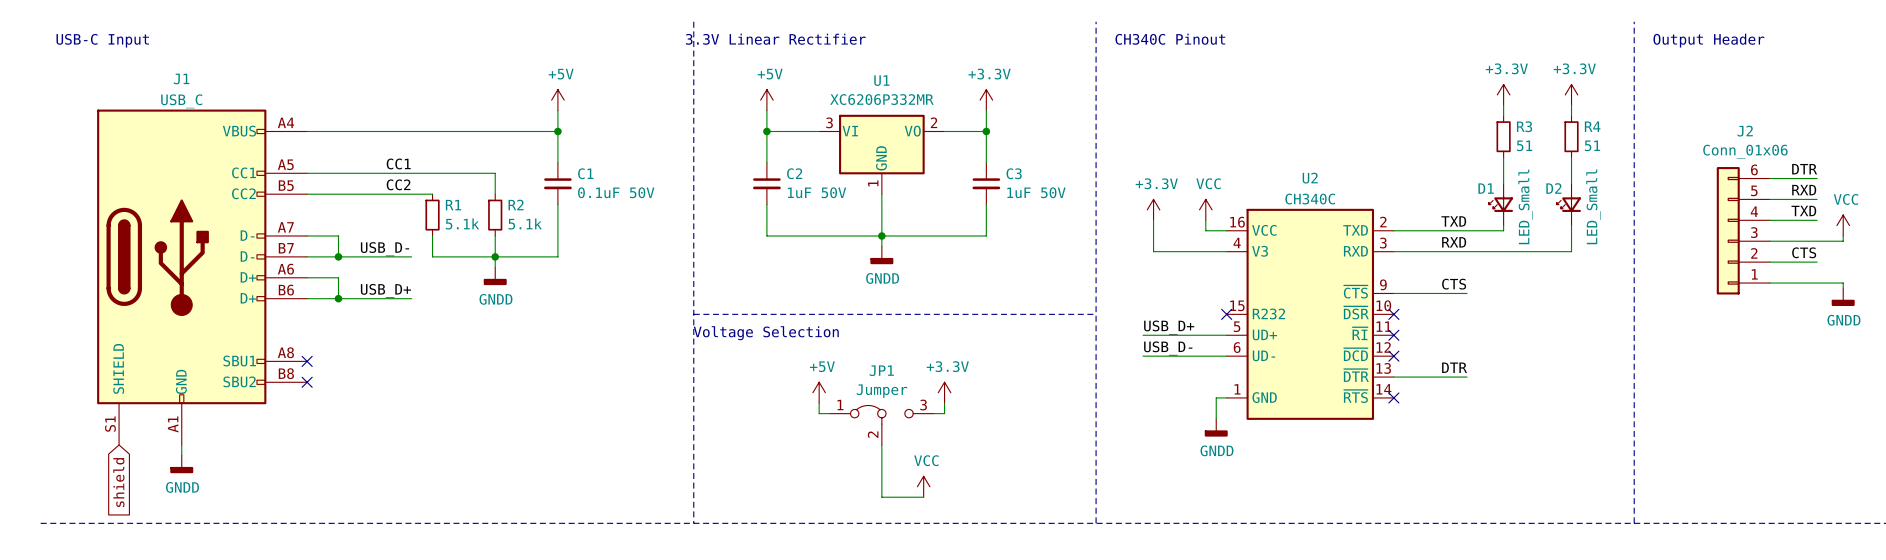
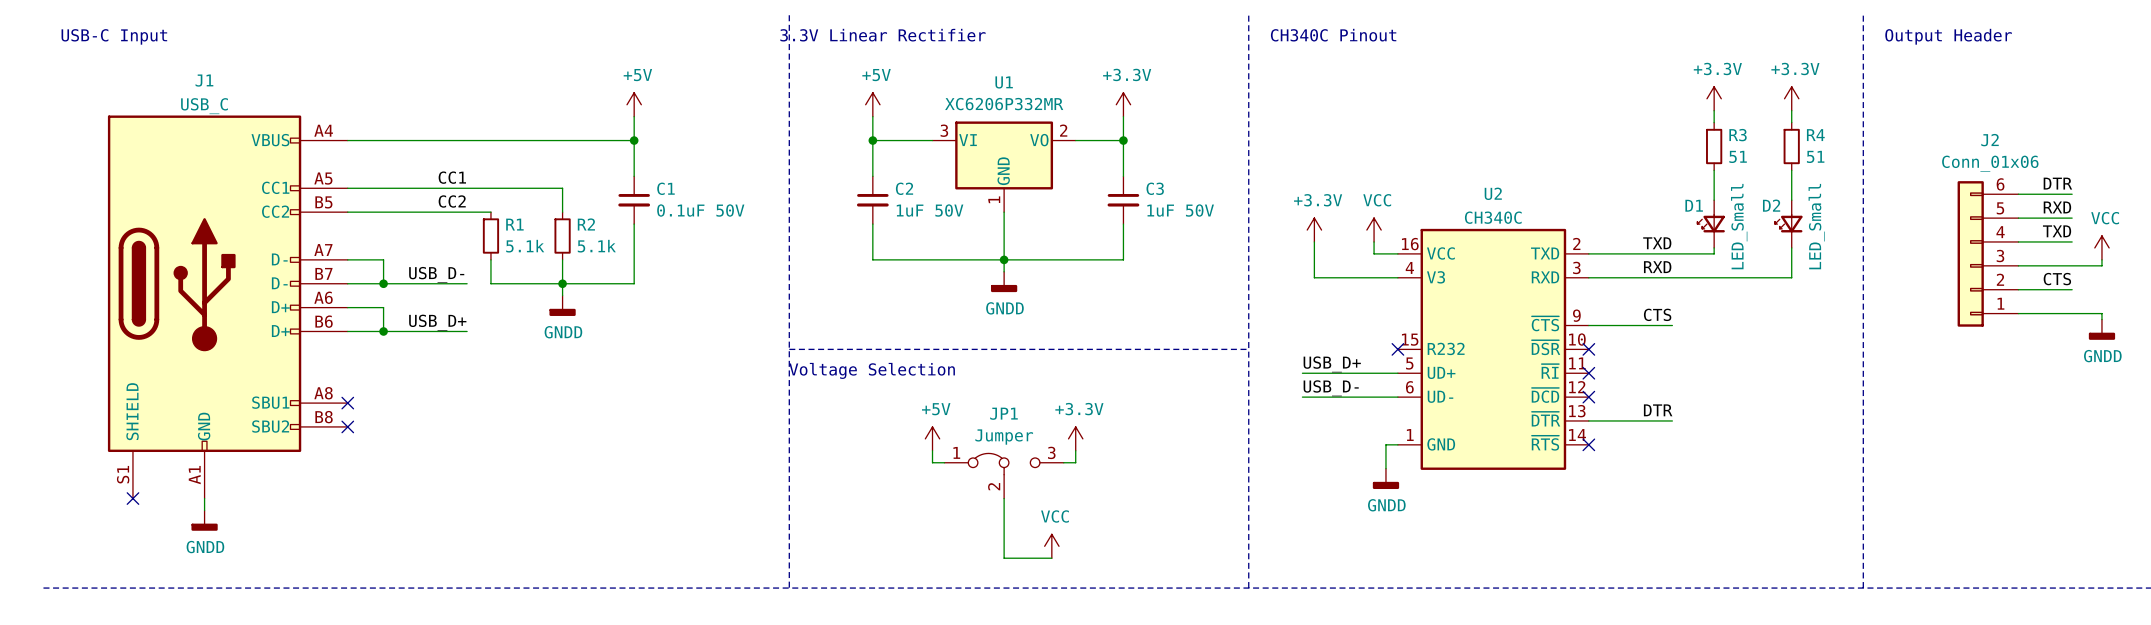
no-connect mark: none -> (132, 498)
global label: shield (118, 482) -> none

